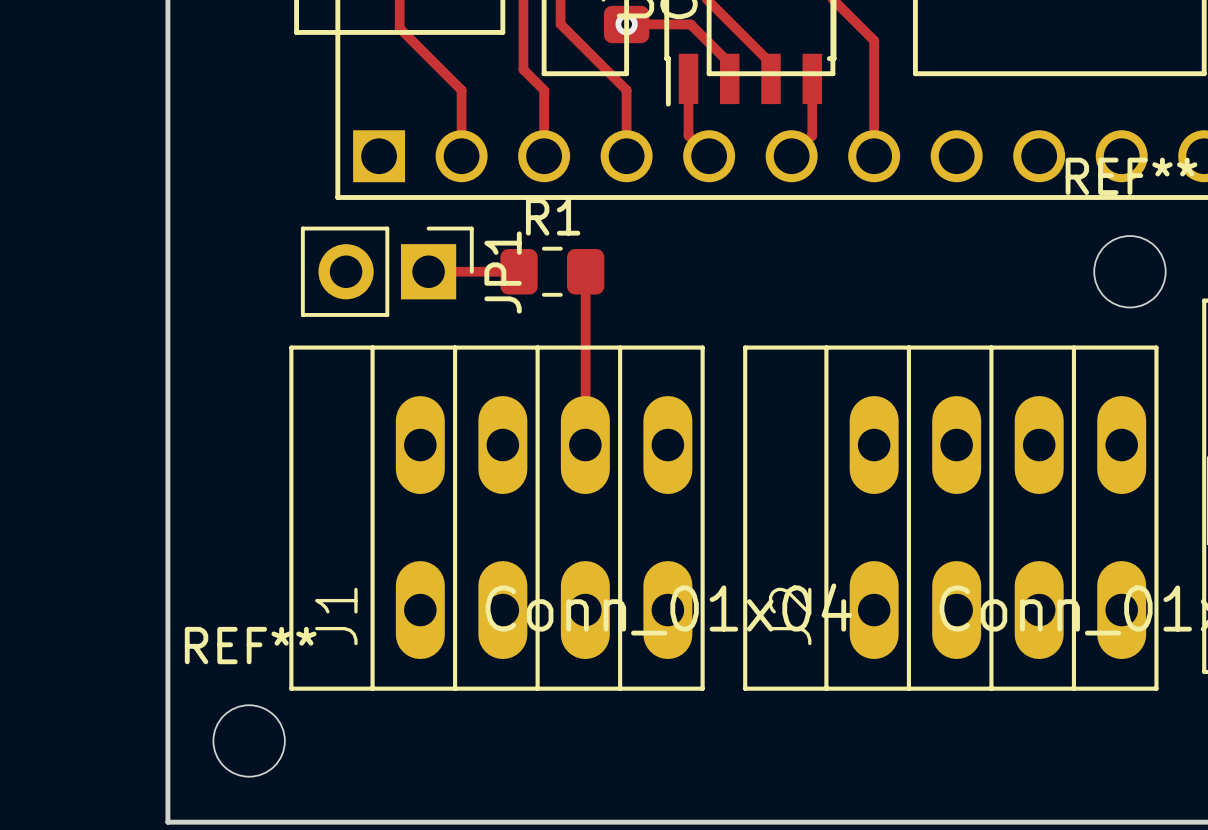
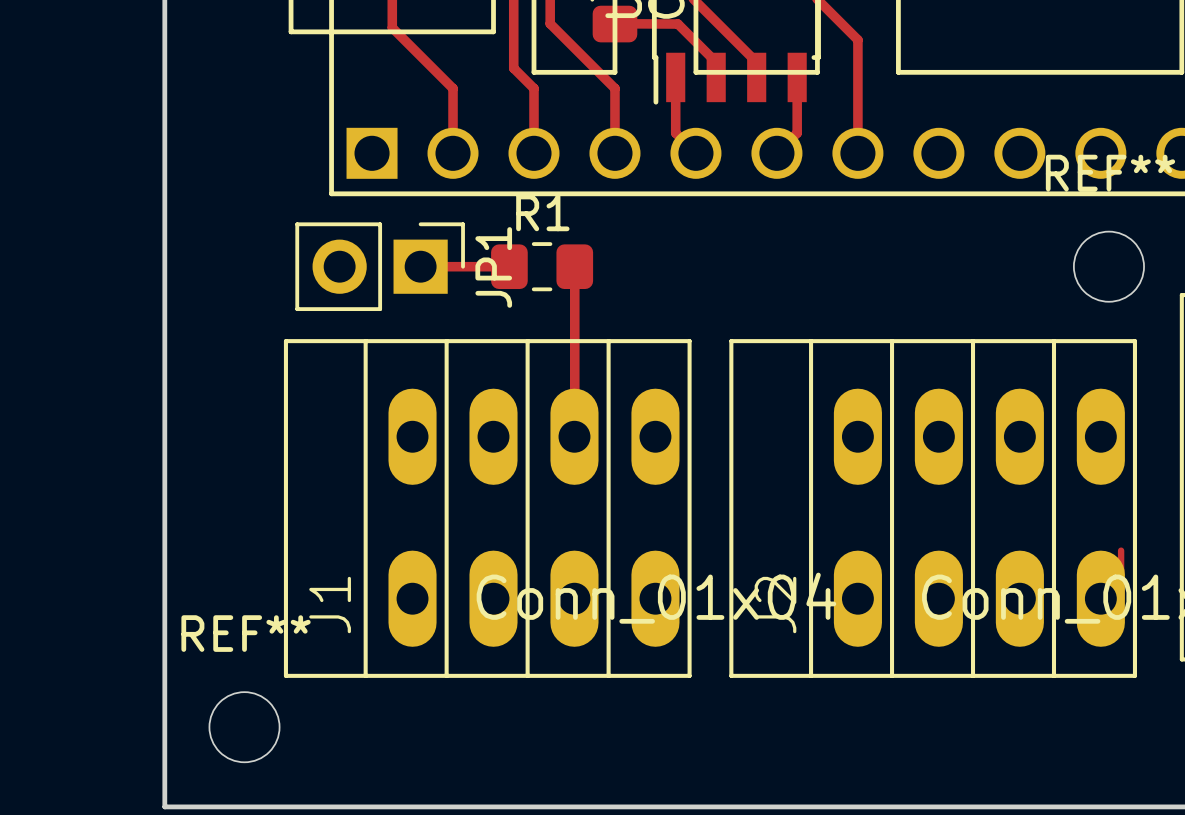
via: (626, 24) -> none
track: none -> (1121, 550) (1121, 598)

